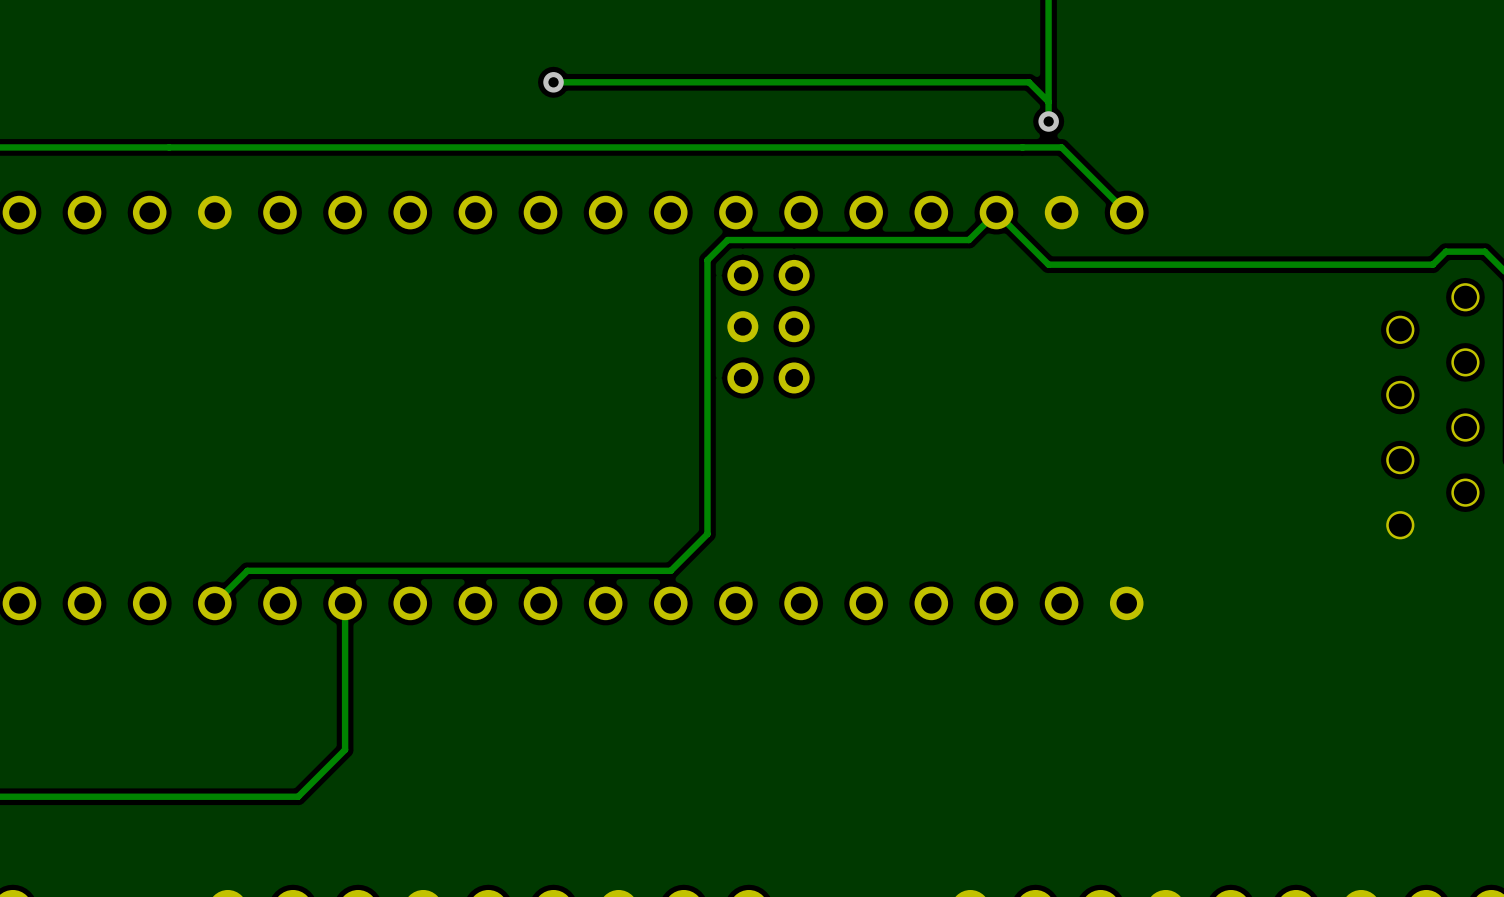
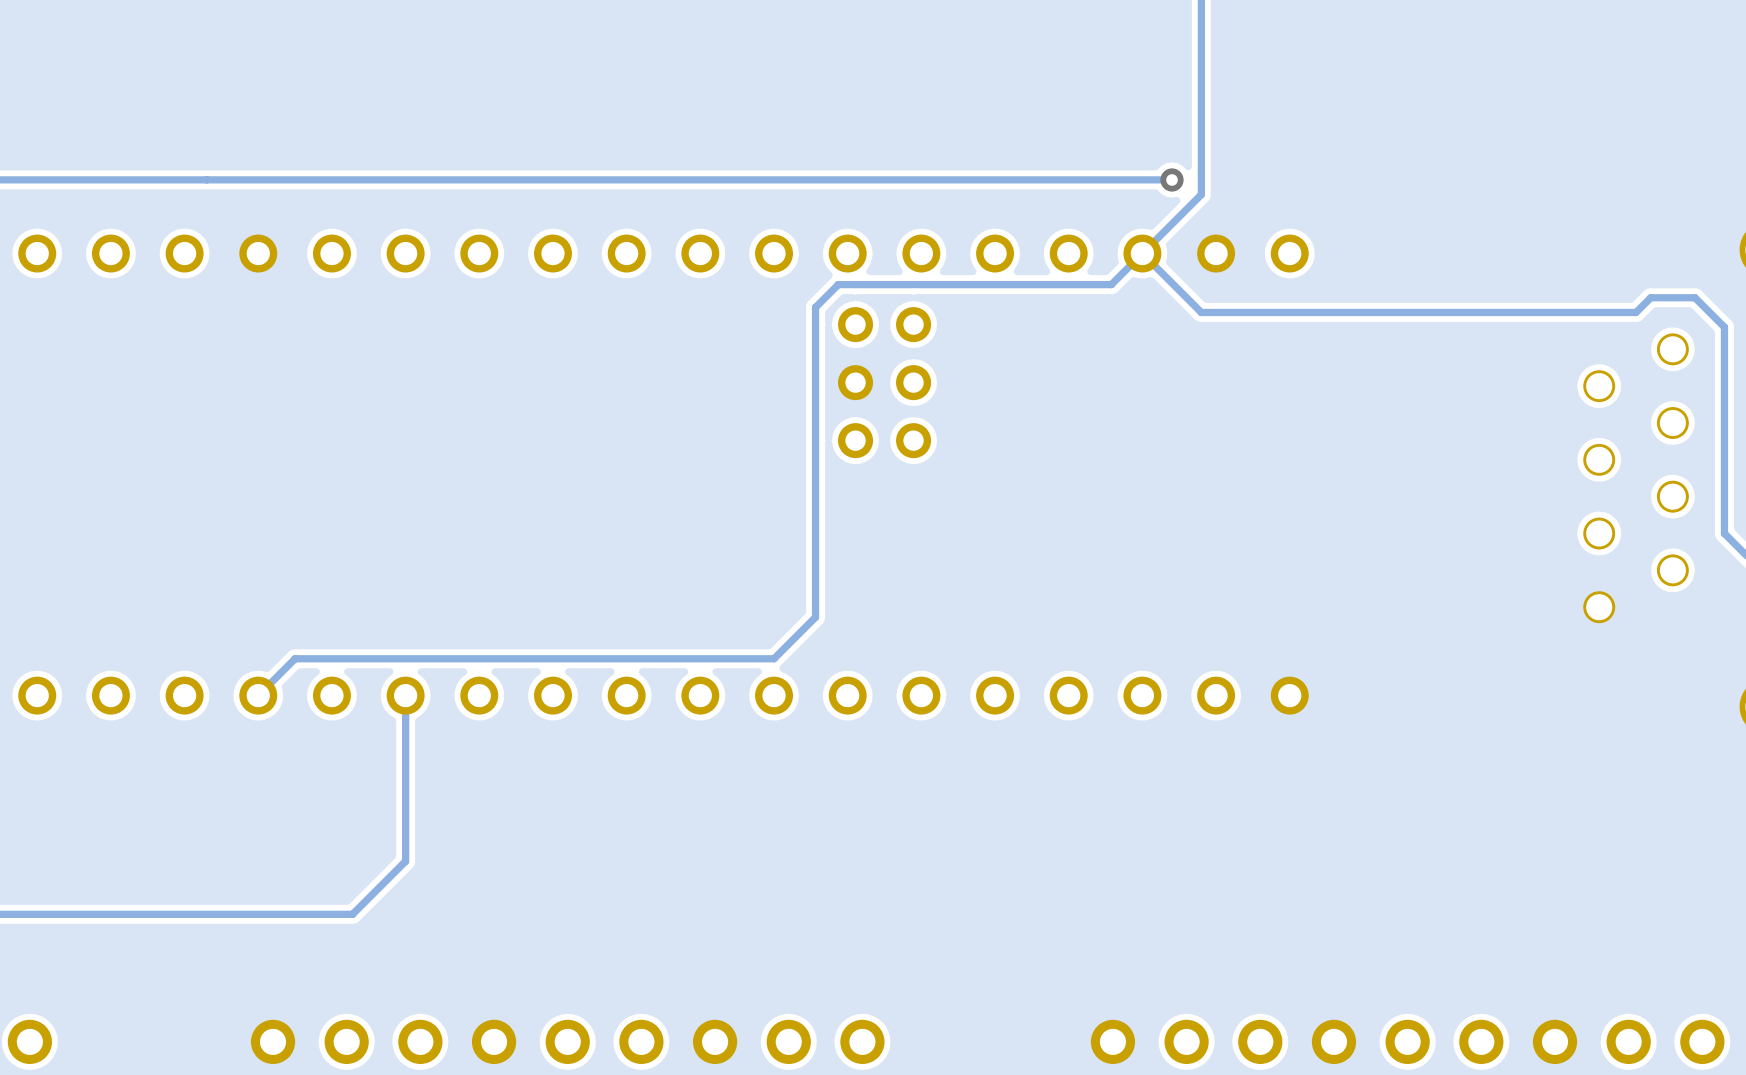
track: (553, 82) (1029, 82) (1048, 101) -> none
via: (553, 82) -> none
track: none -> (1201, 150) (1201, 194) (1142, 253)
via position: (1048, 121) -> (1172, 179)
track: (1022, 147) (1061, 147) (1126, 212) -> none

